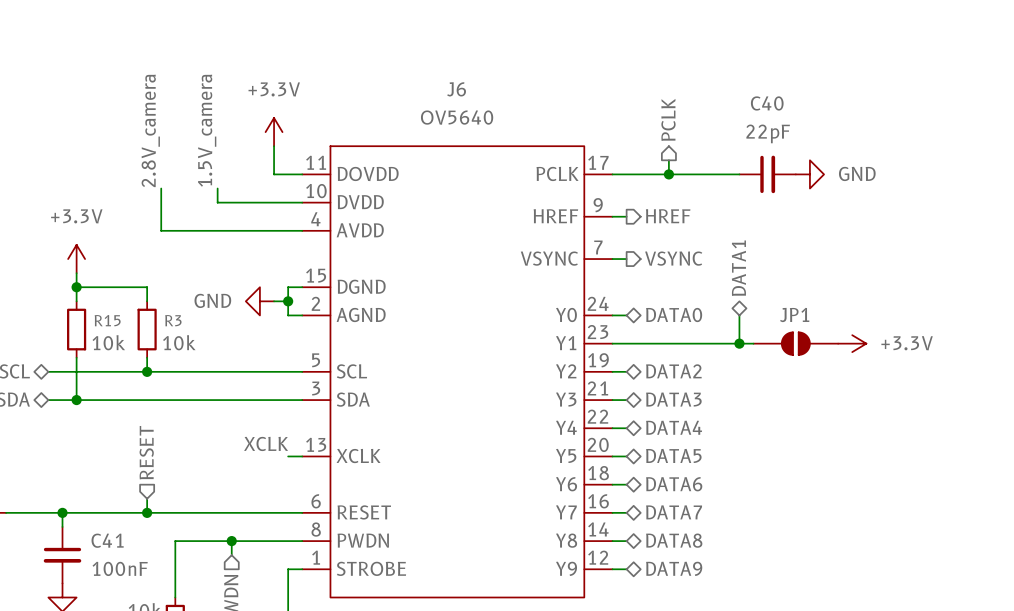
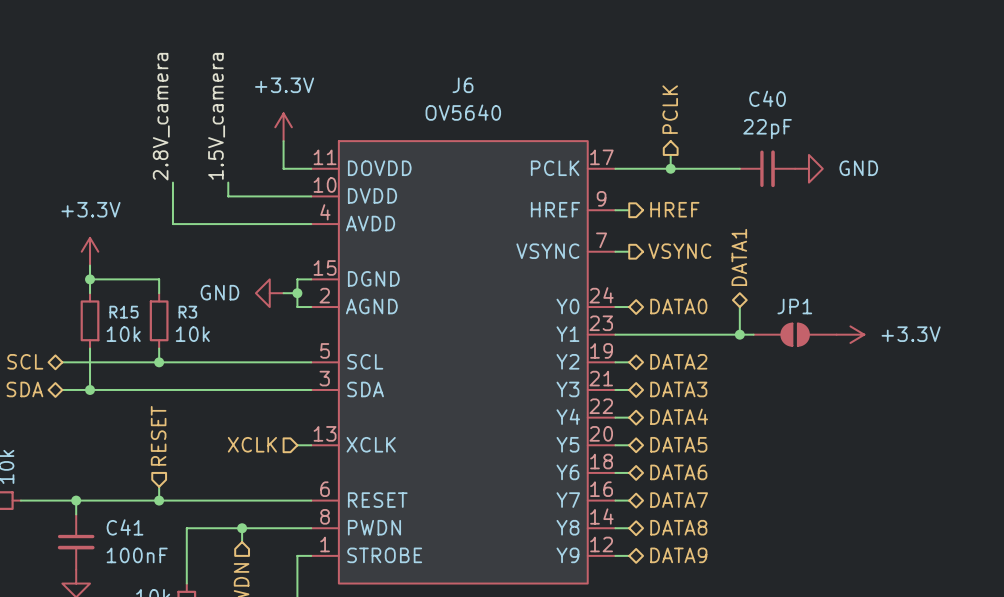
label: XCLK (266, 443) -> none
hierarchical label: none -> XCLK (252, 444)

